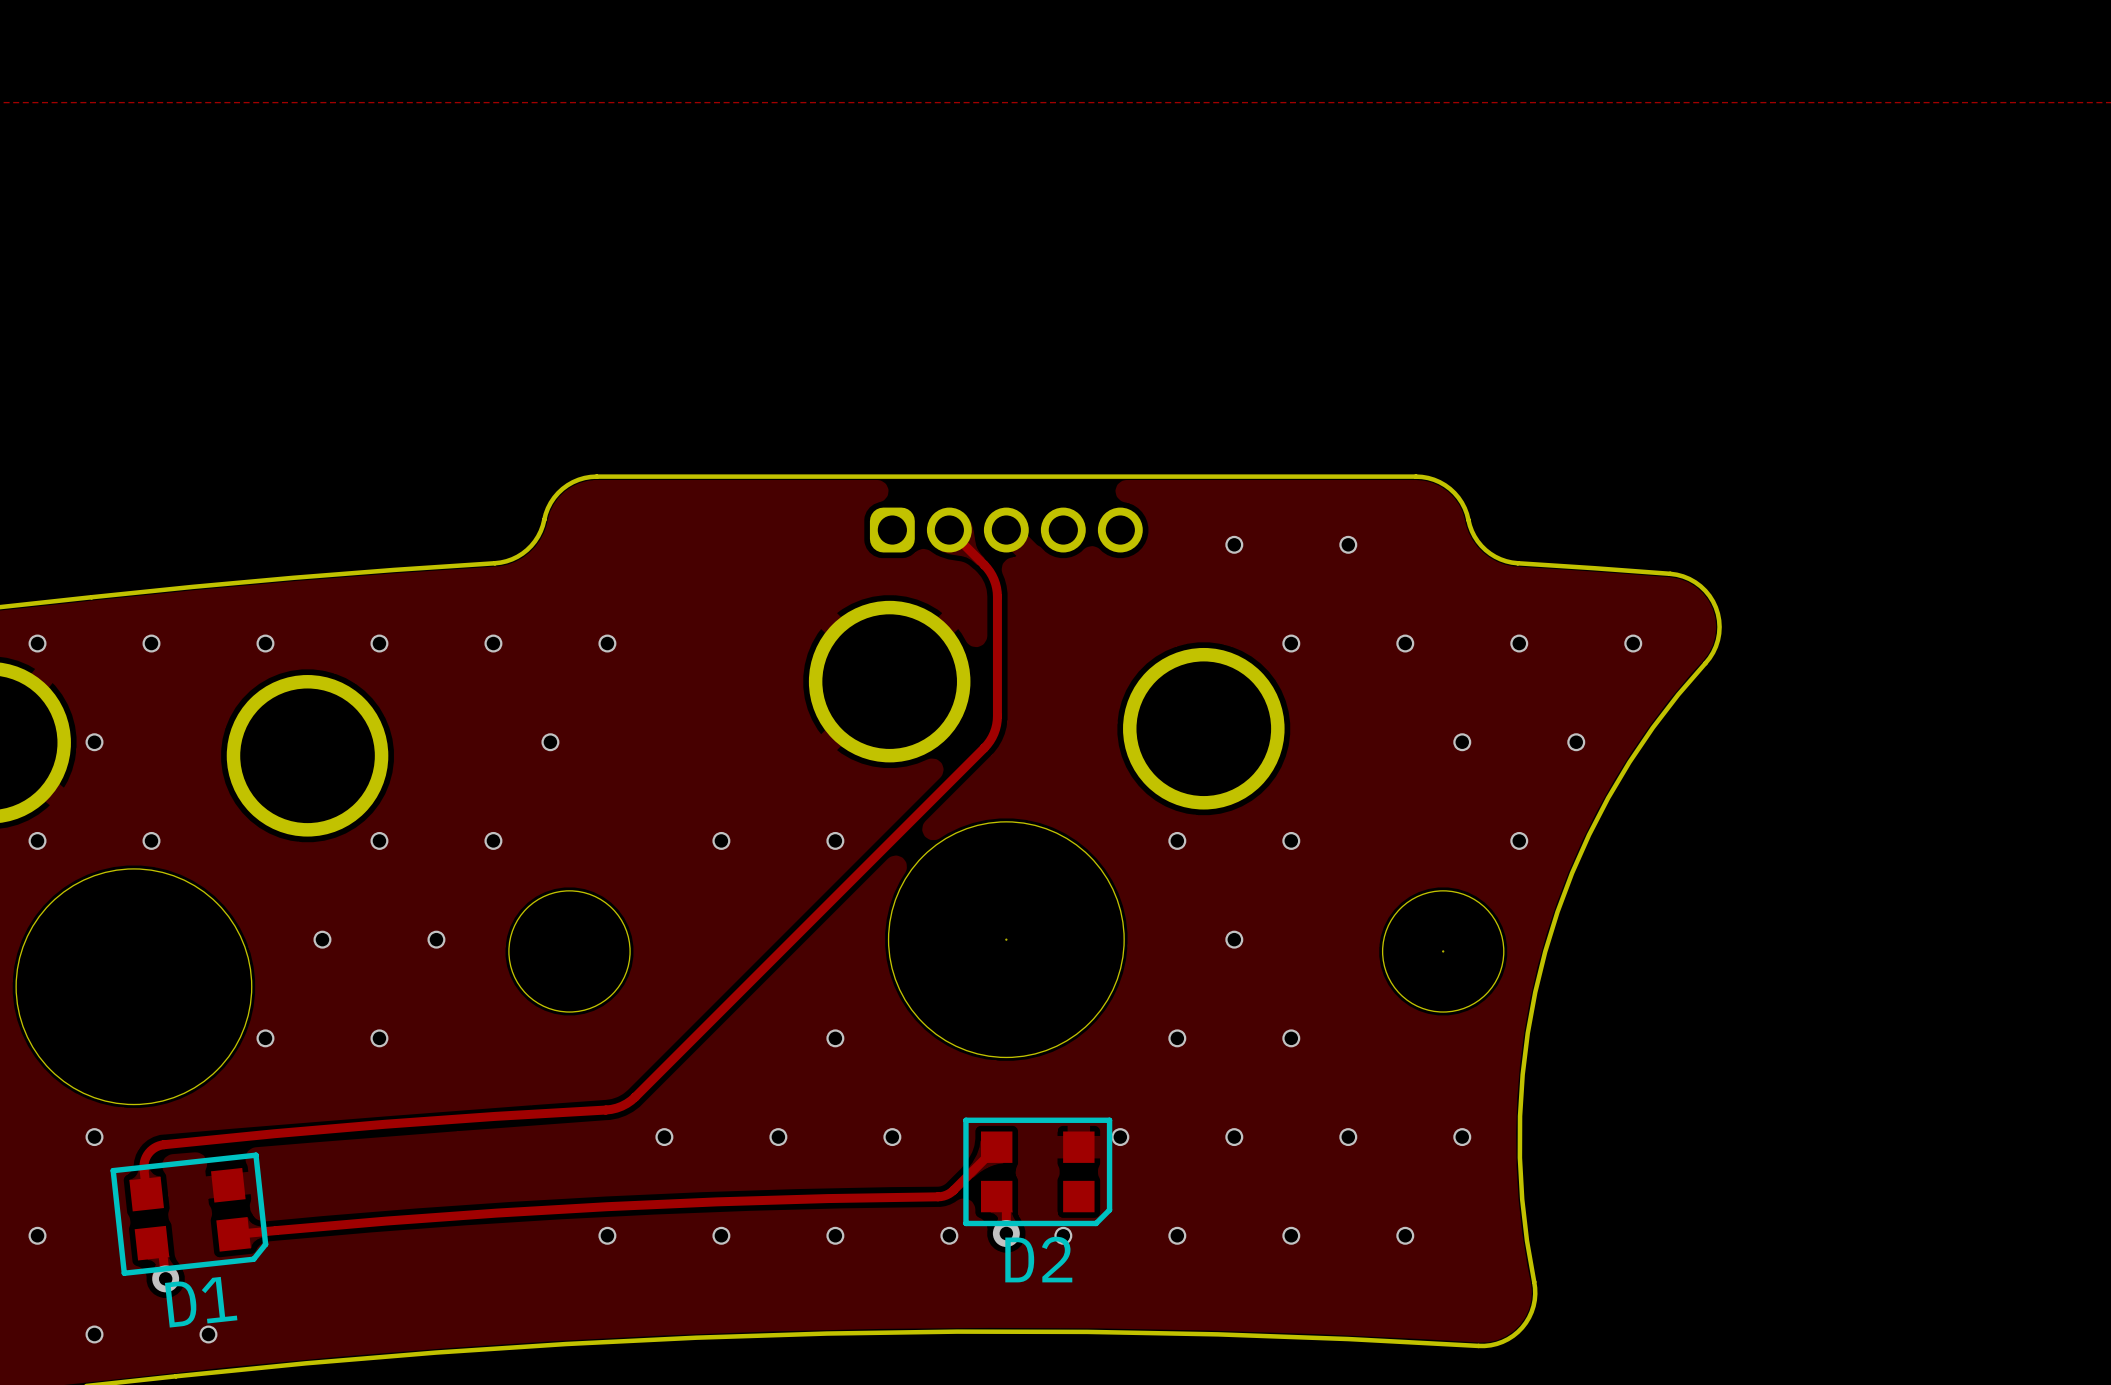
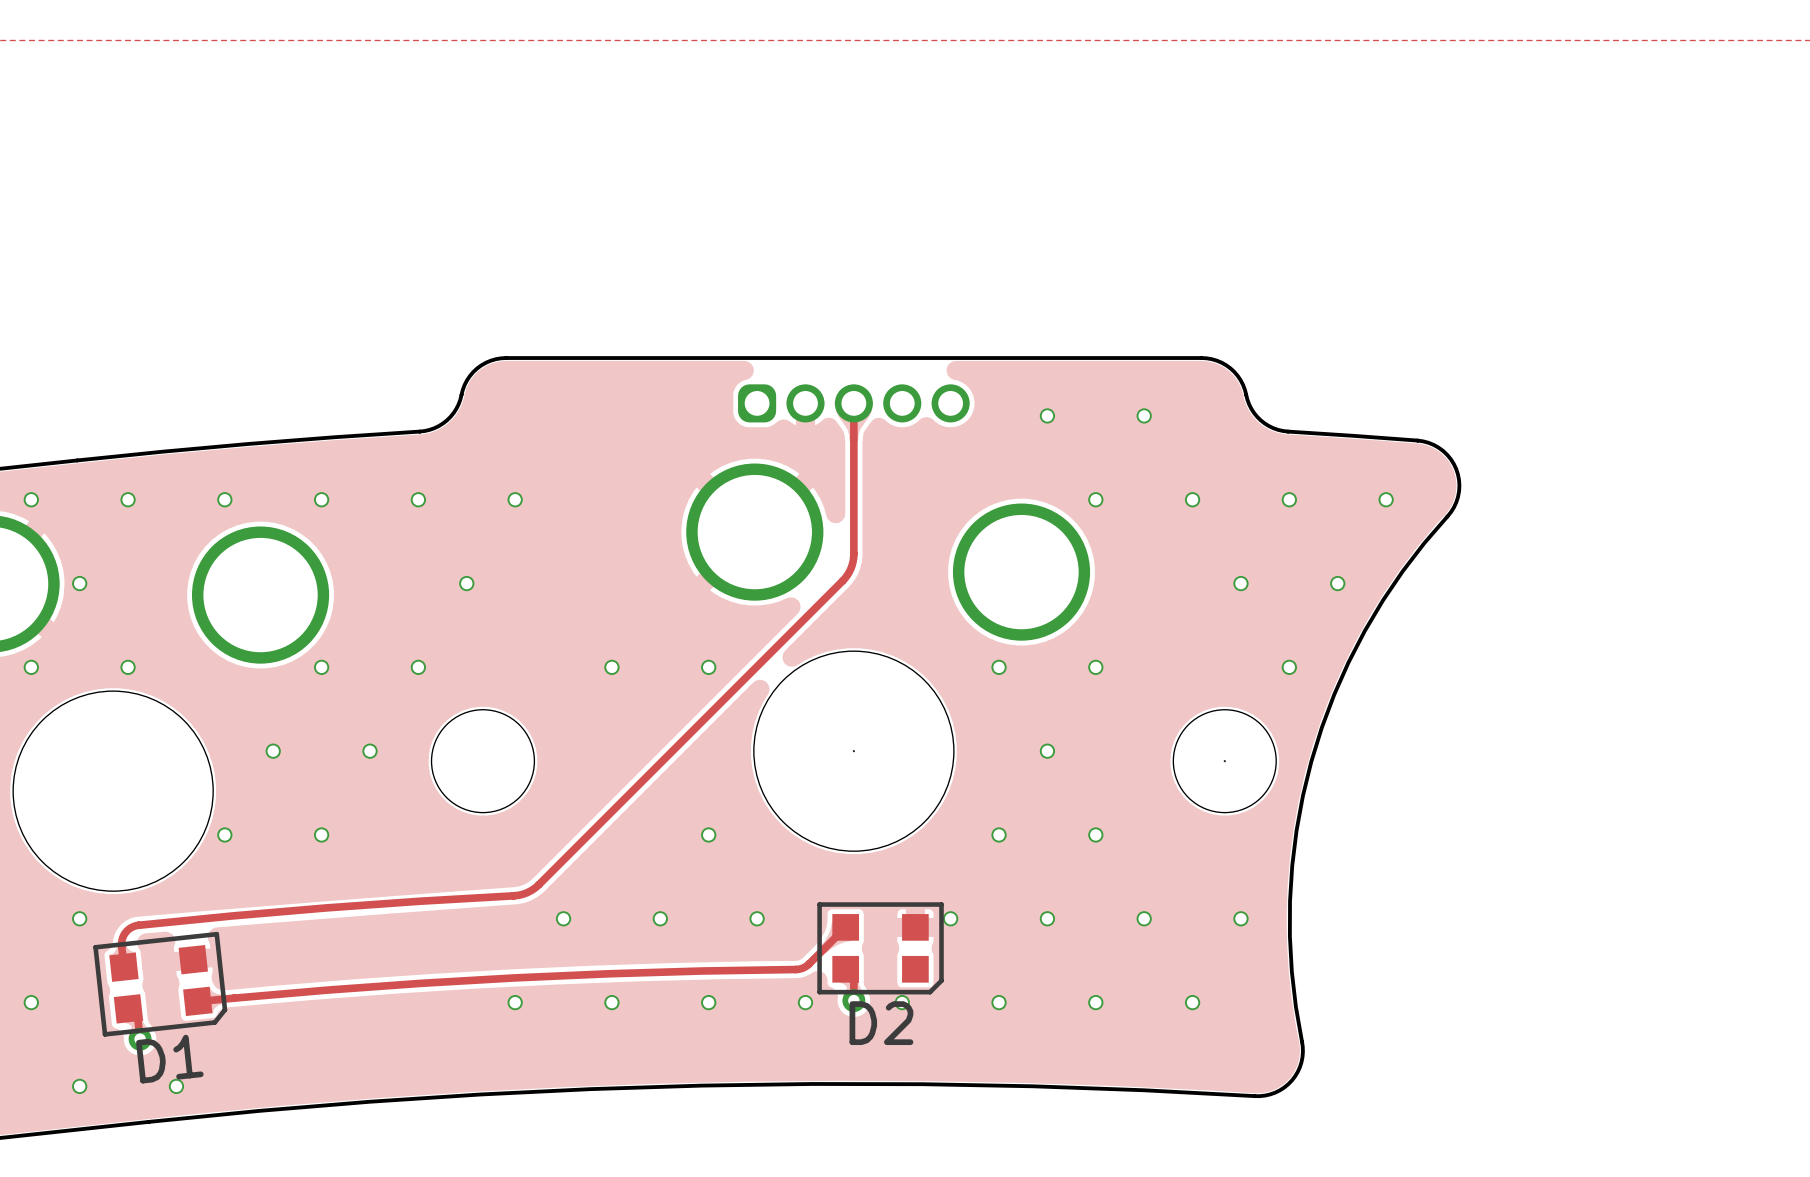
track: (949, 530) (987, 568) (996, 587) (997, 720) (994, 733) (984, 747) -> (853, 403) (853, 557) (847, 575) (835, 588)

